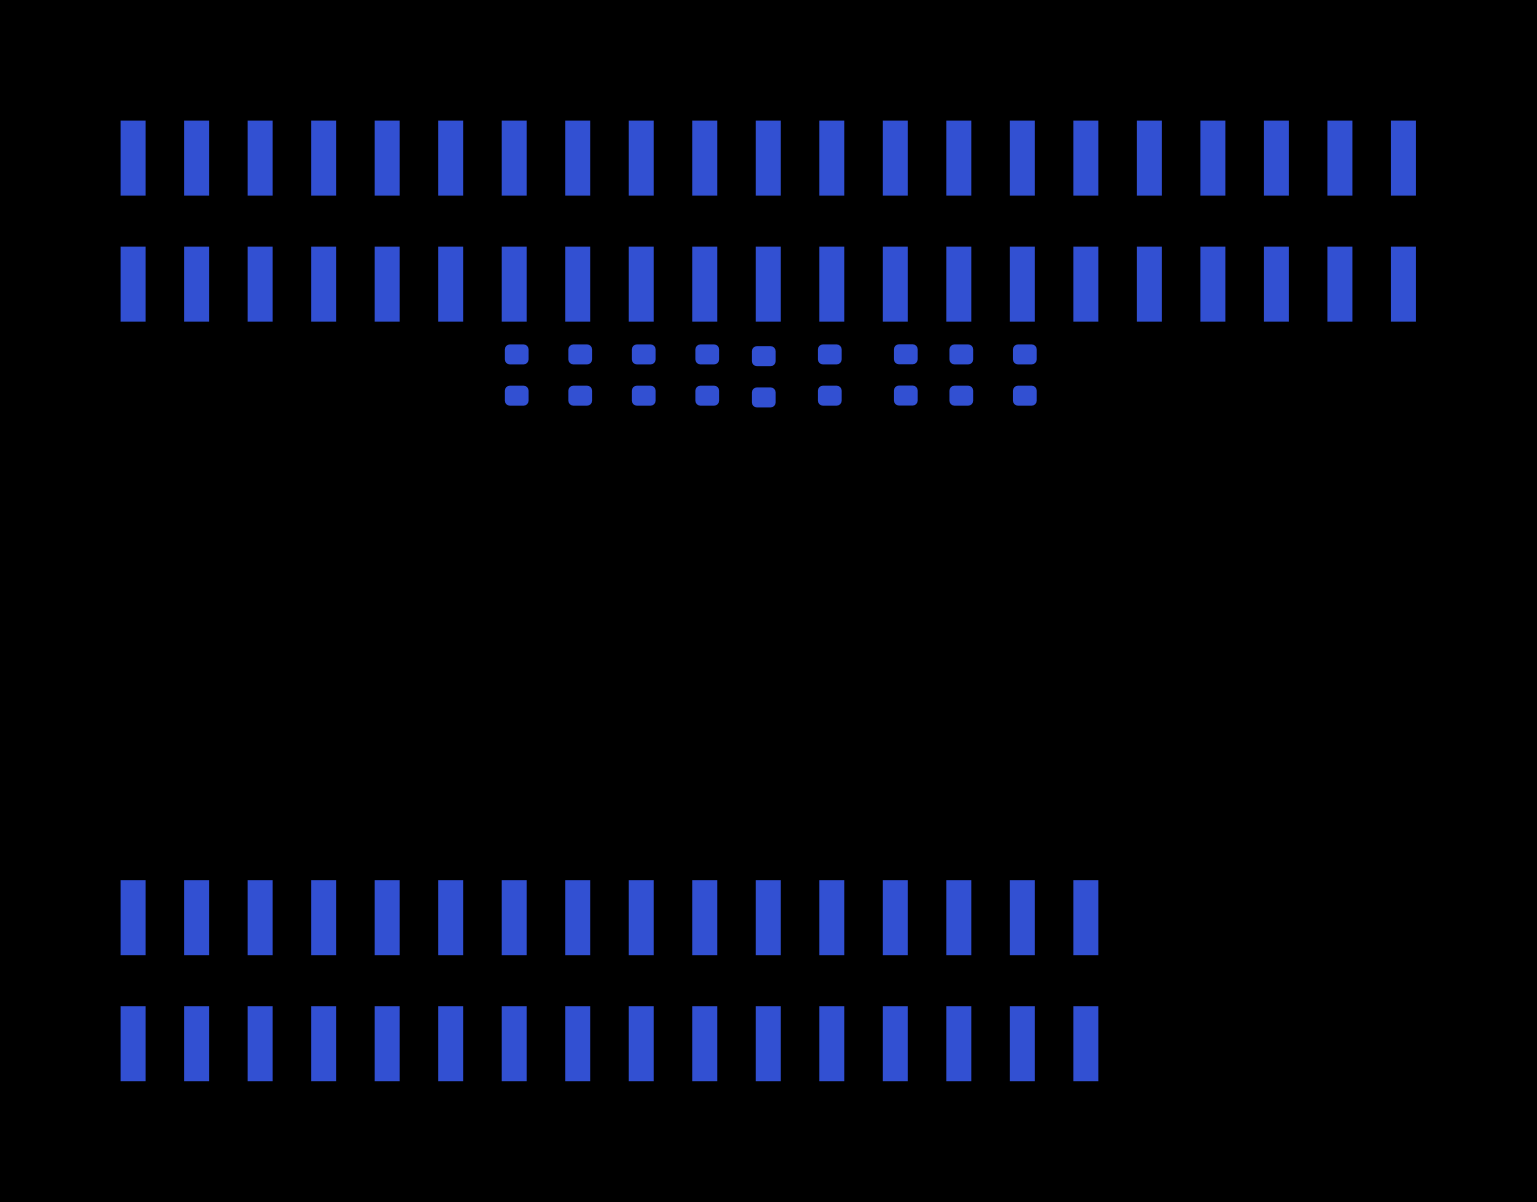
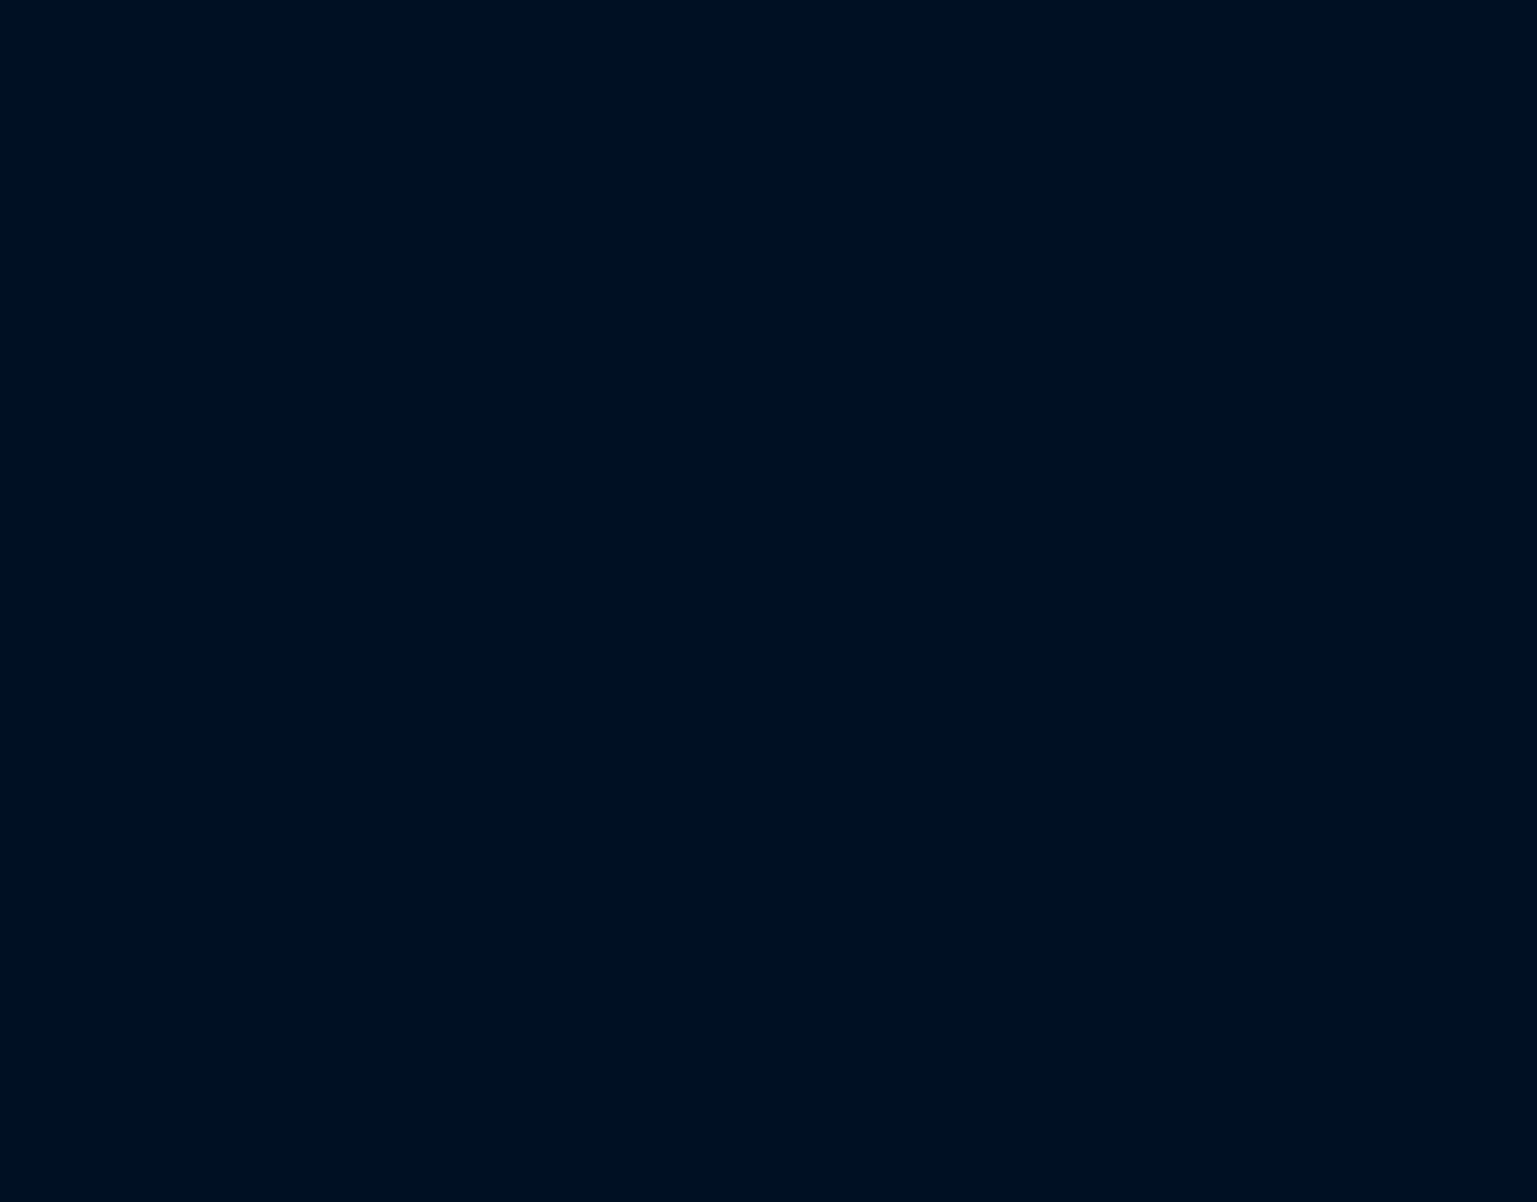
part: (768, 221) -> none
part: (905, 374) -> none
part: (516, 375) -> none
part: (580, 375) -> none
part: (643, 375) -> none
part: (707, 375) -> none
part: (829, 375) -> none
part: (961, 375) -> none
part: (1024, 375) -> none
part: (763, 376) -> none
part: (609, 980) -> none

